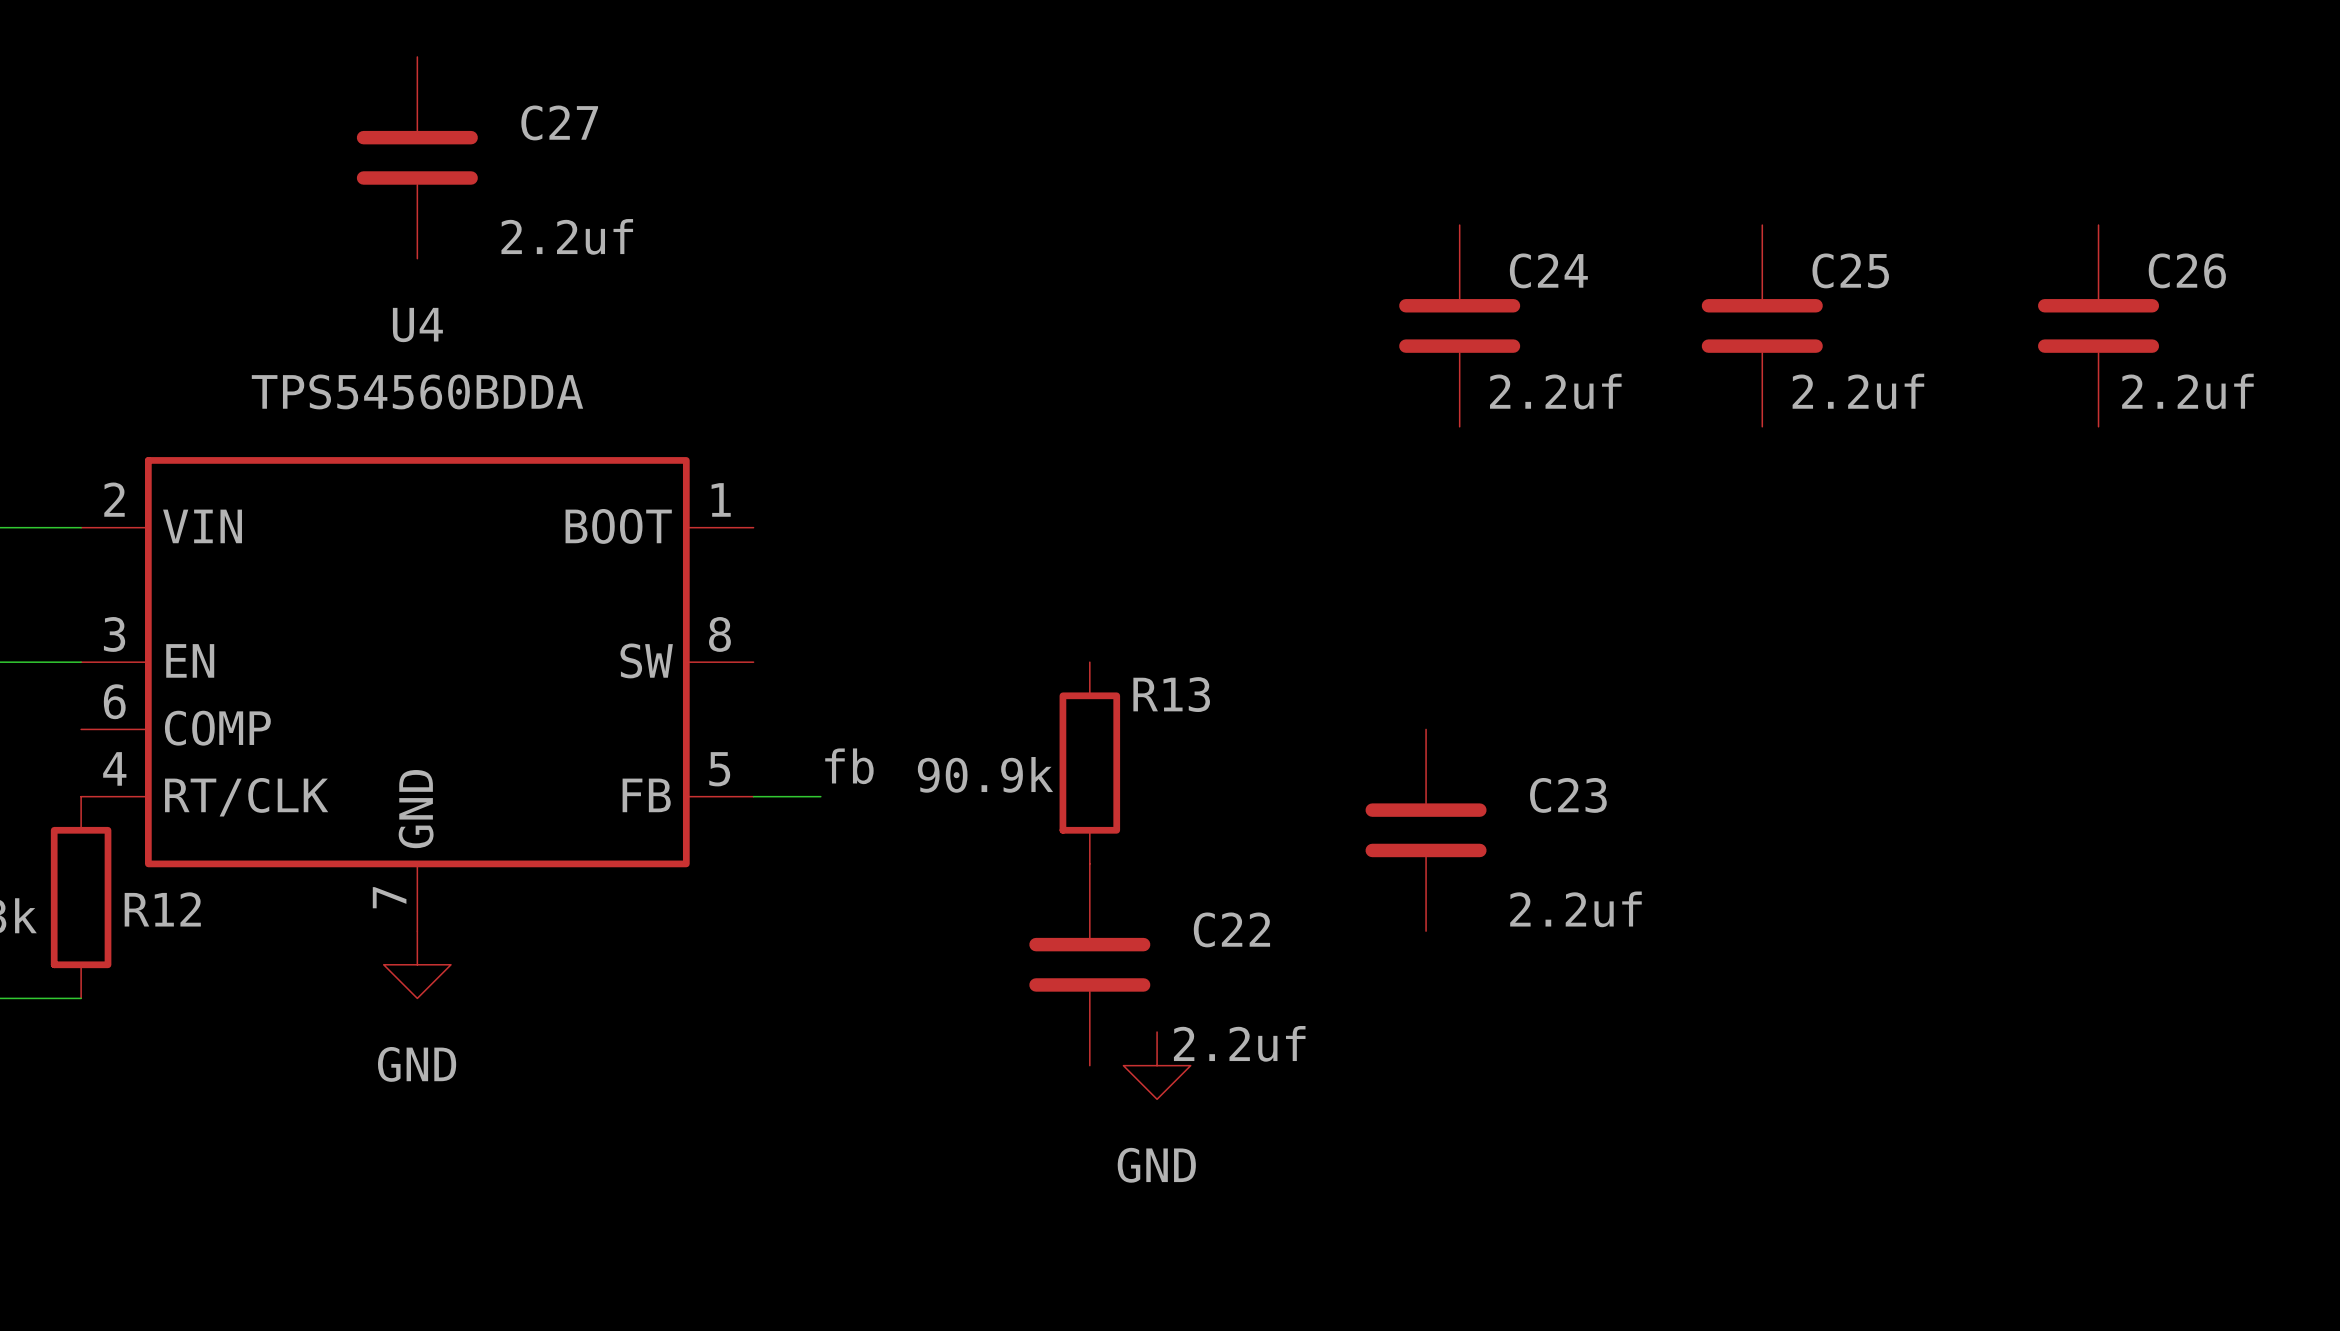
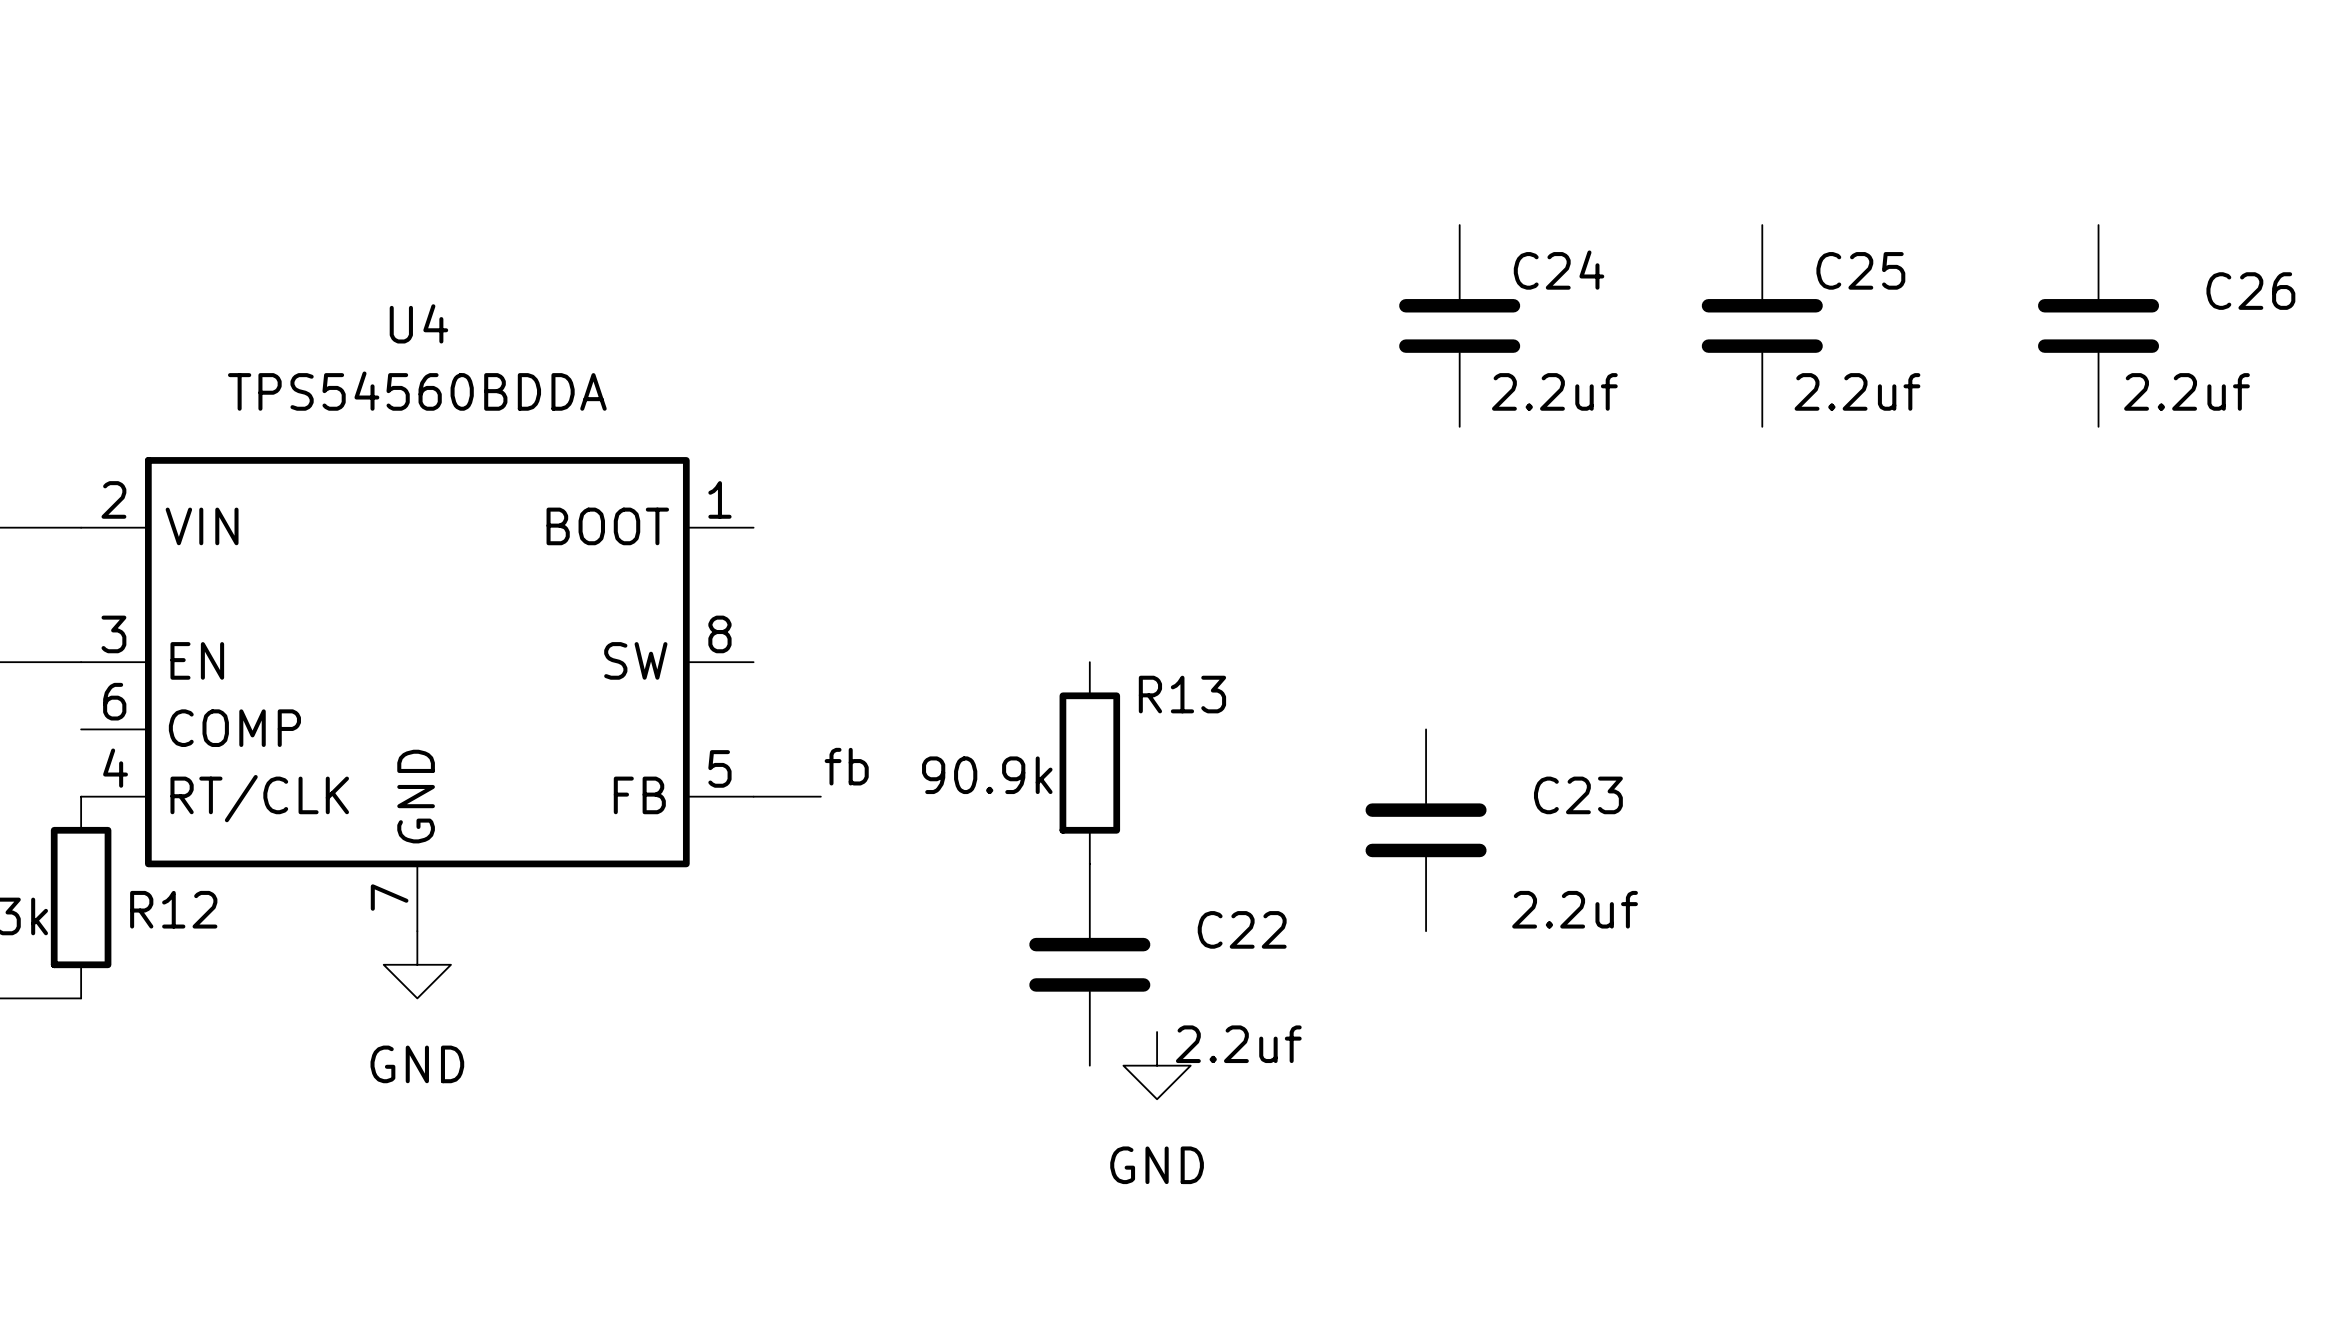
C27: 2.2uf (417, 157) -> none
C26 name position: C26 (2187, 270) -> C26 (2250, 291)

